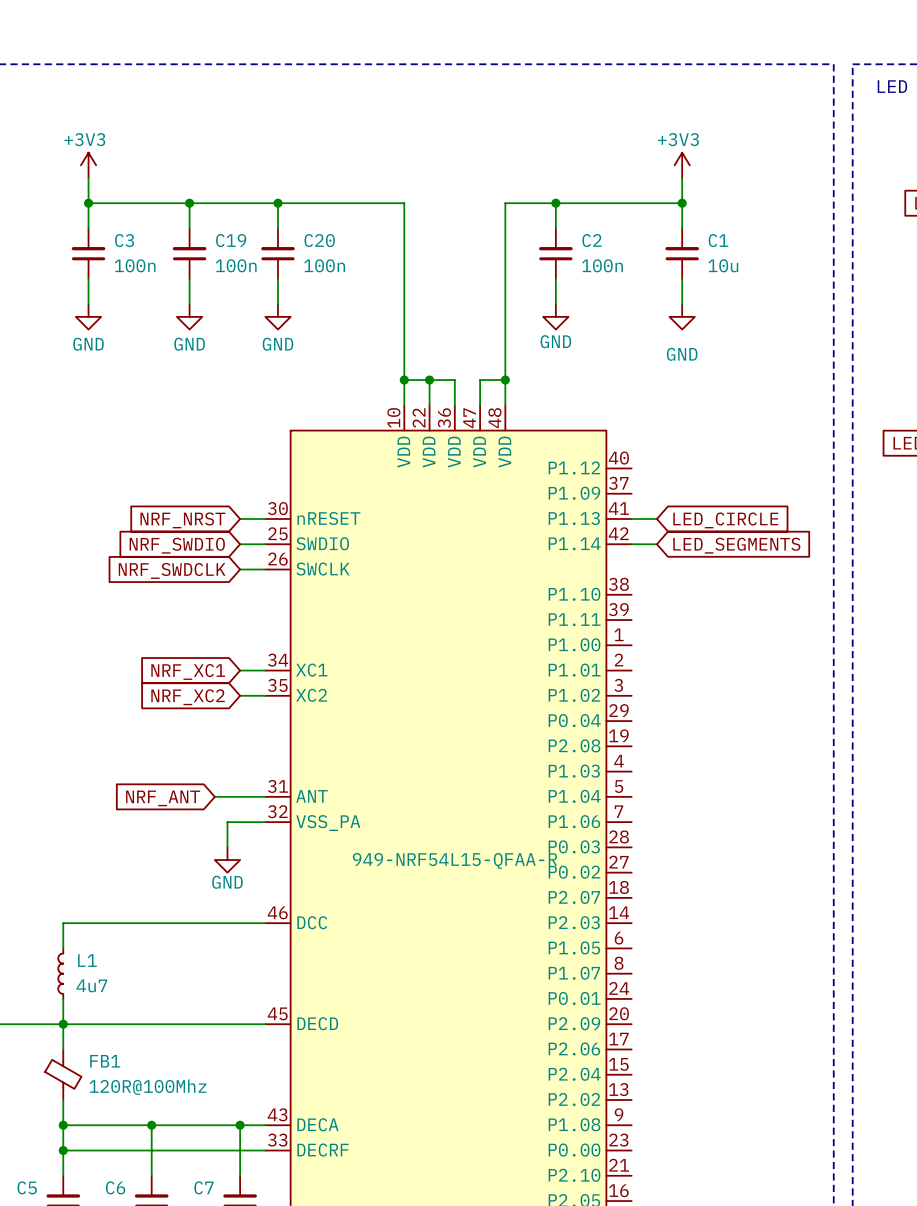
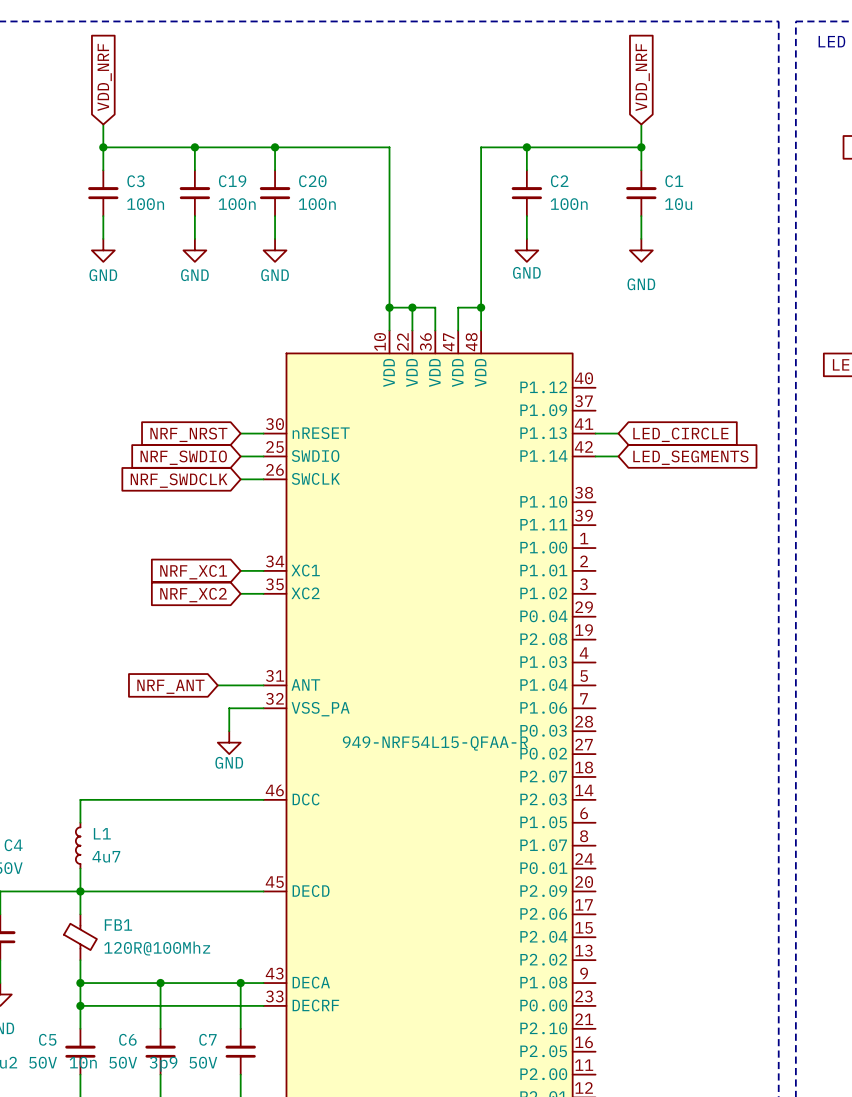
global label: none -> VDD_NRF (104, 77)
global label: none -> VDD_NRF (642, 77)
power symbol: +3V3 (88, 165) -> none
power symbol: +3V3 (682, 165) -> none

